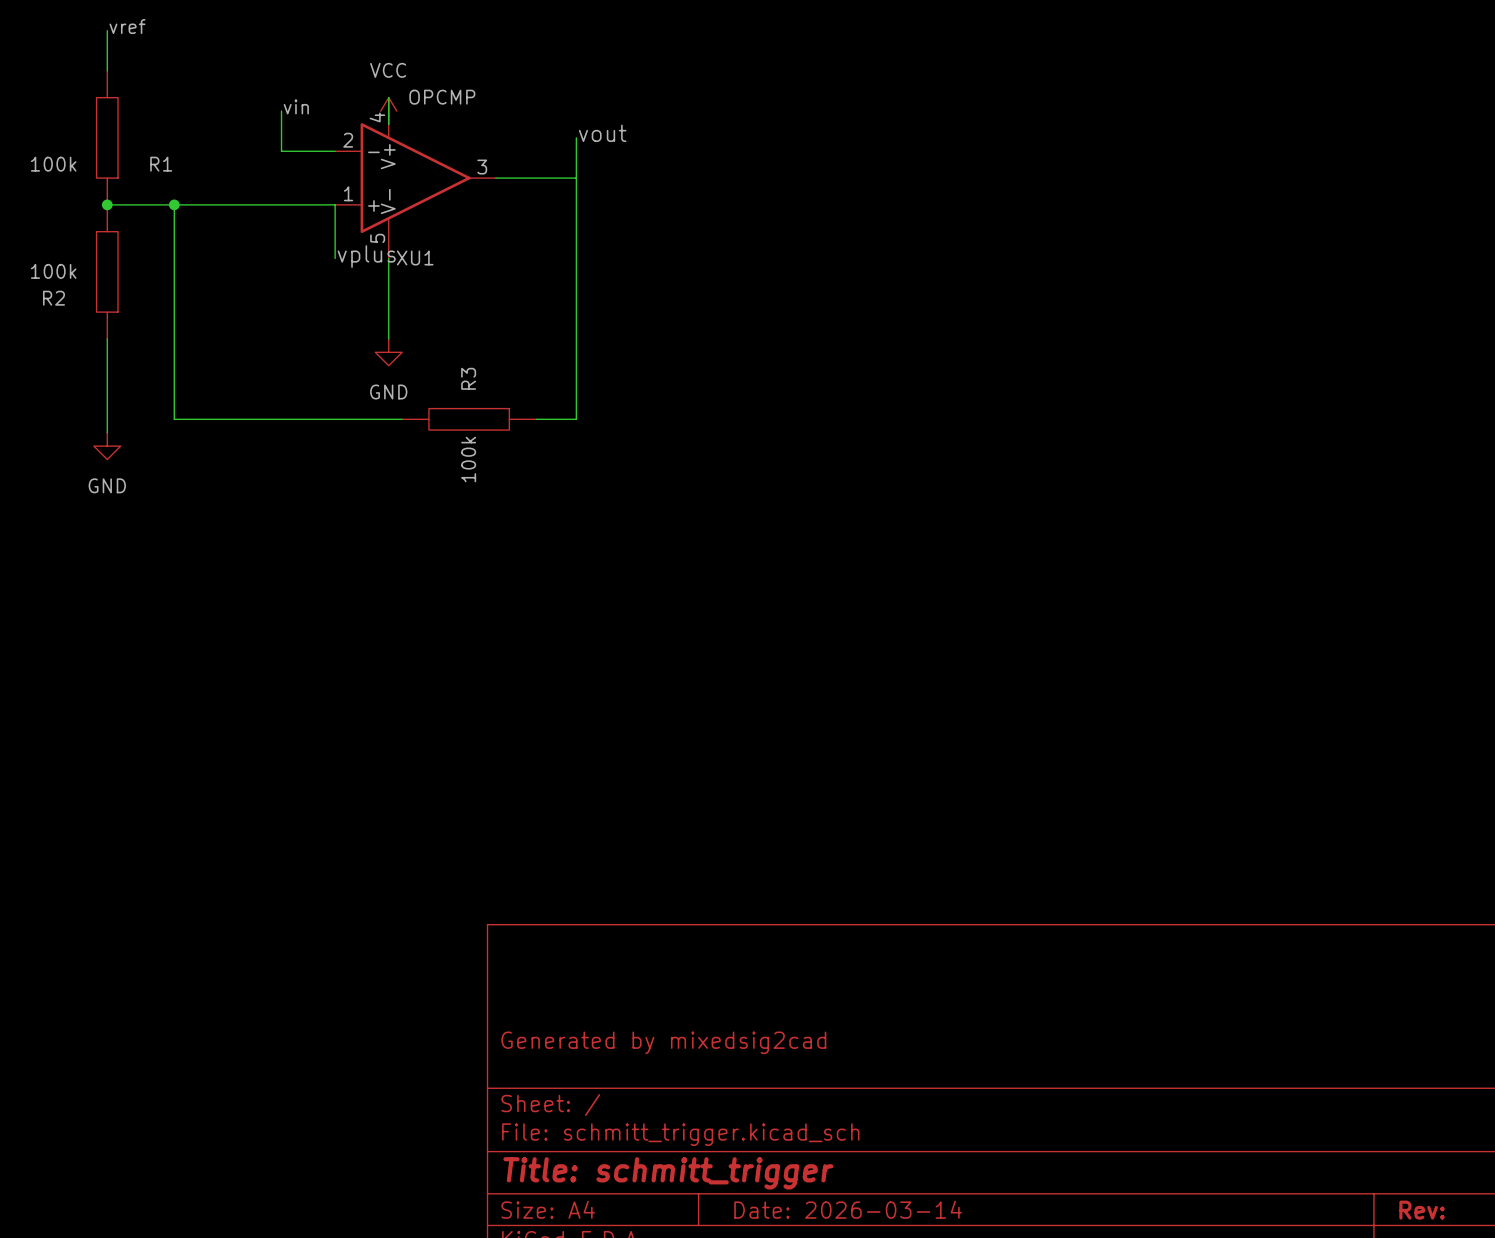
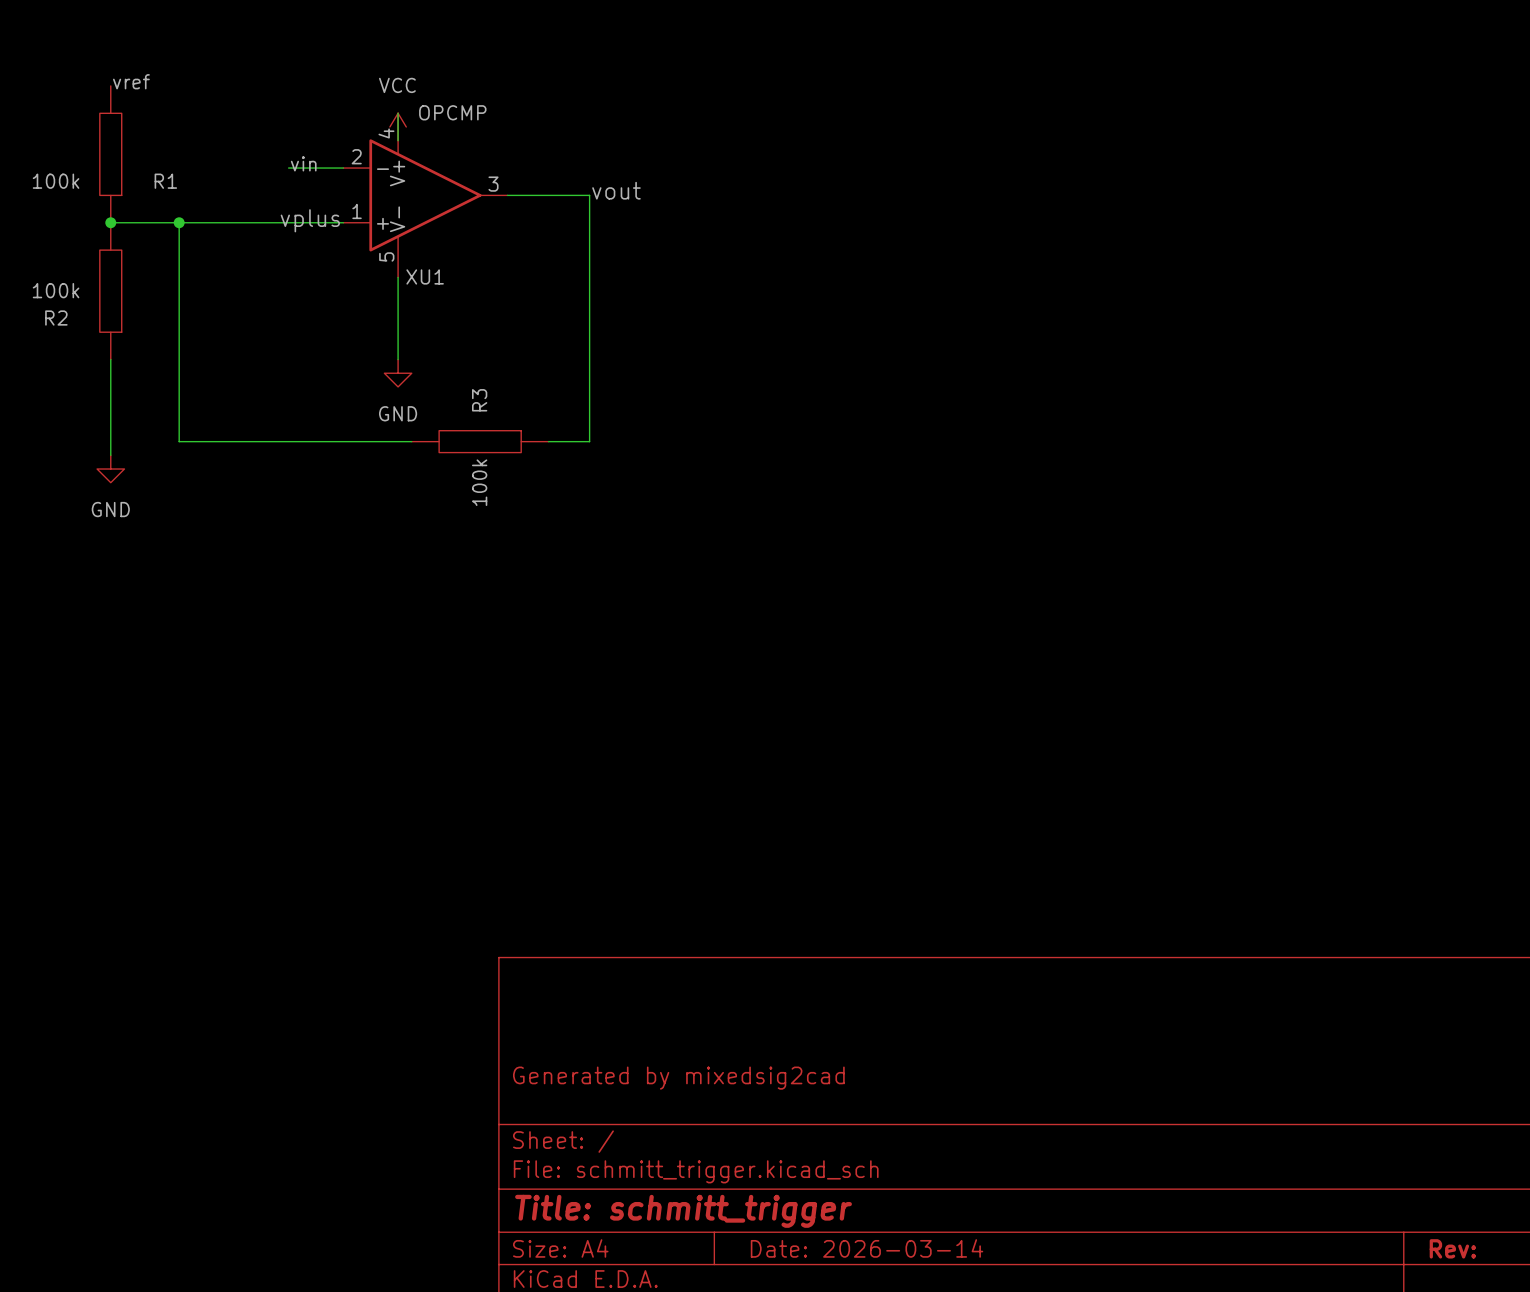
label position: vref (127, 26) -> vref (131, 81)
wire: (107, 30) (107, 70) -> none
label position: vin (296, 106) -> vin (303, 163)
wire: (281, 111) (281, 151) -> none
label position: vout (602, 133) -> vout (616, 190)
wire: (576, 137) (576, 178) -> none
wire: (335, 204) (335, 258) -> none
label position: vplus (366, 256) -> vplus (310, 220)

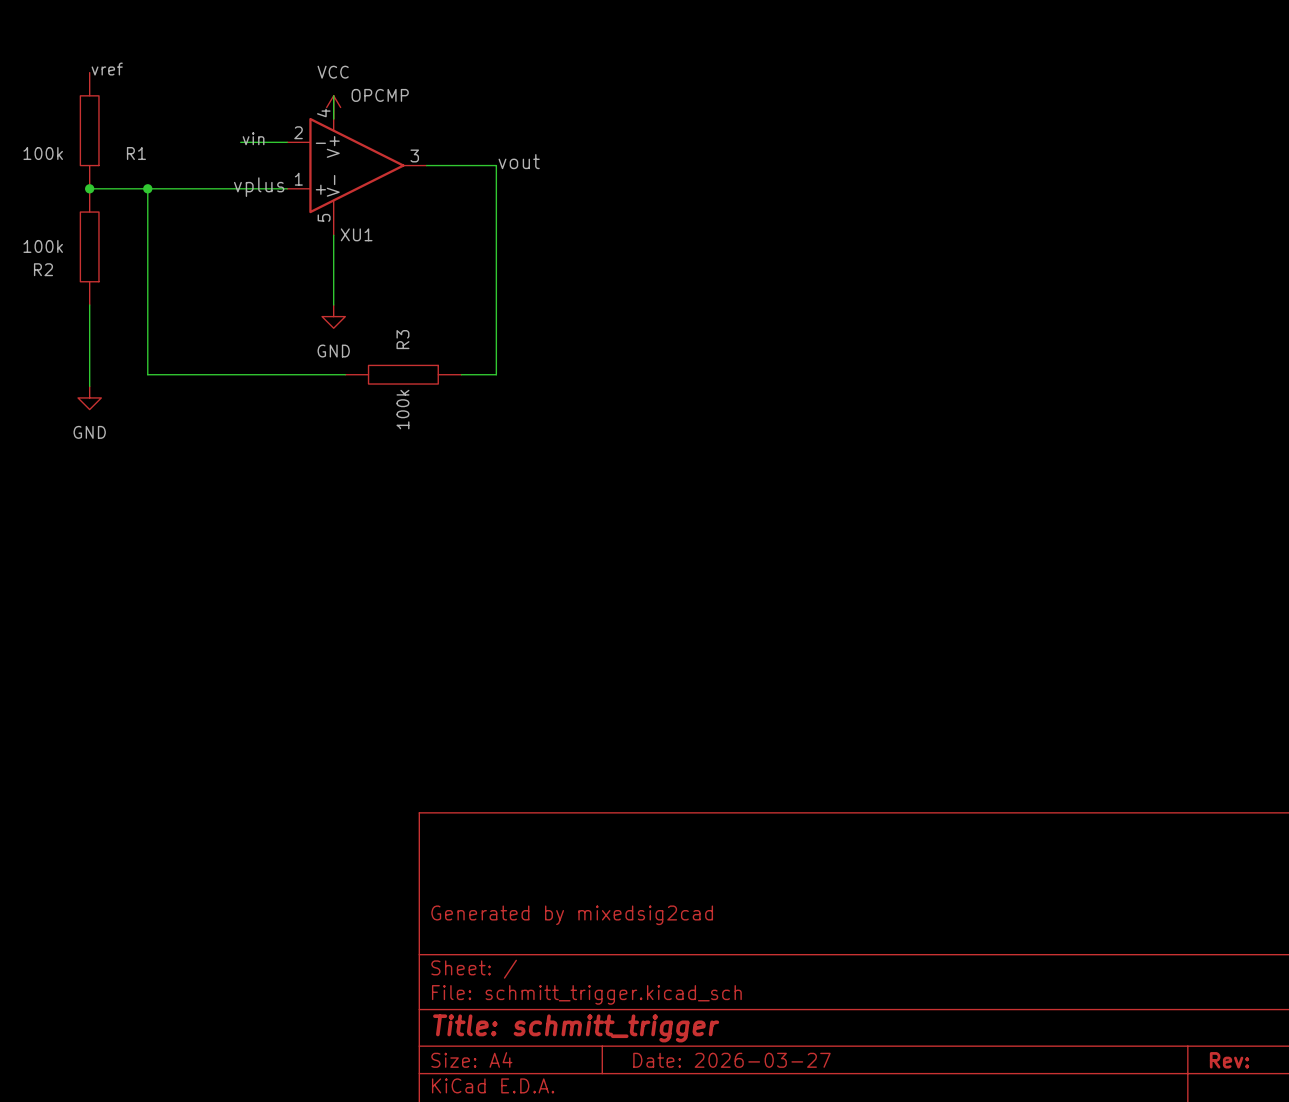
title block: Date: 2026-03-14 (867, 1248) -> Date: 2026-03-27 (731, 1060)

